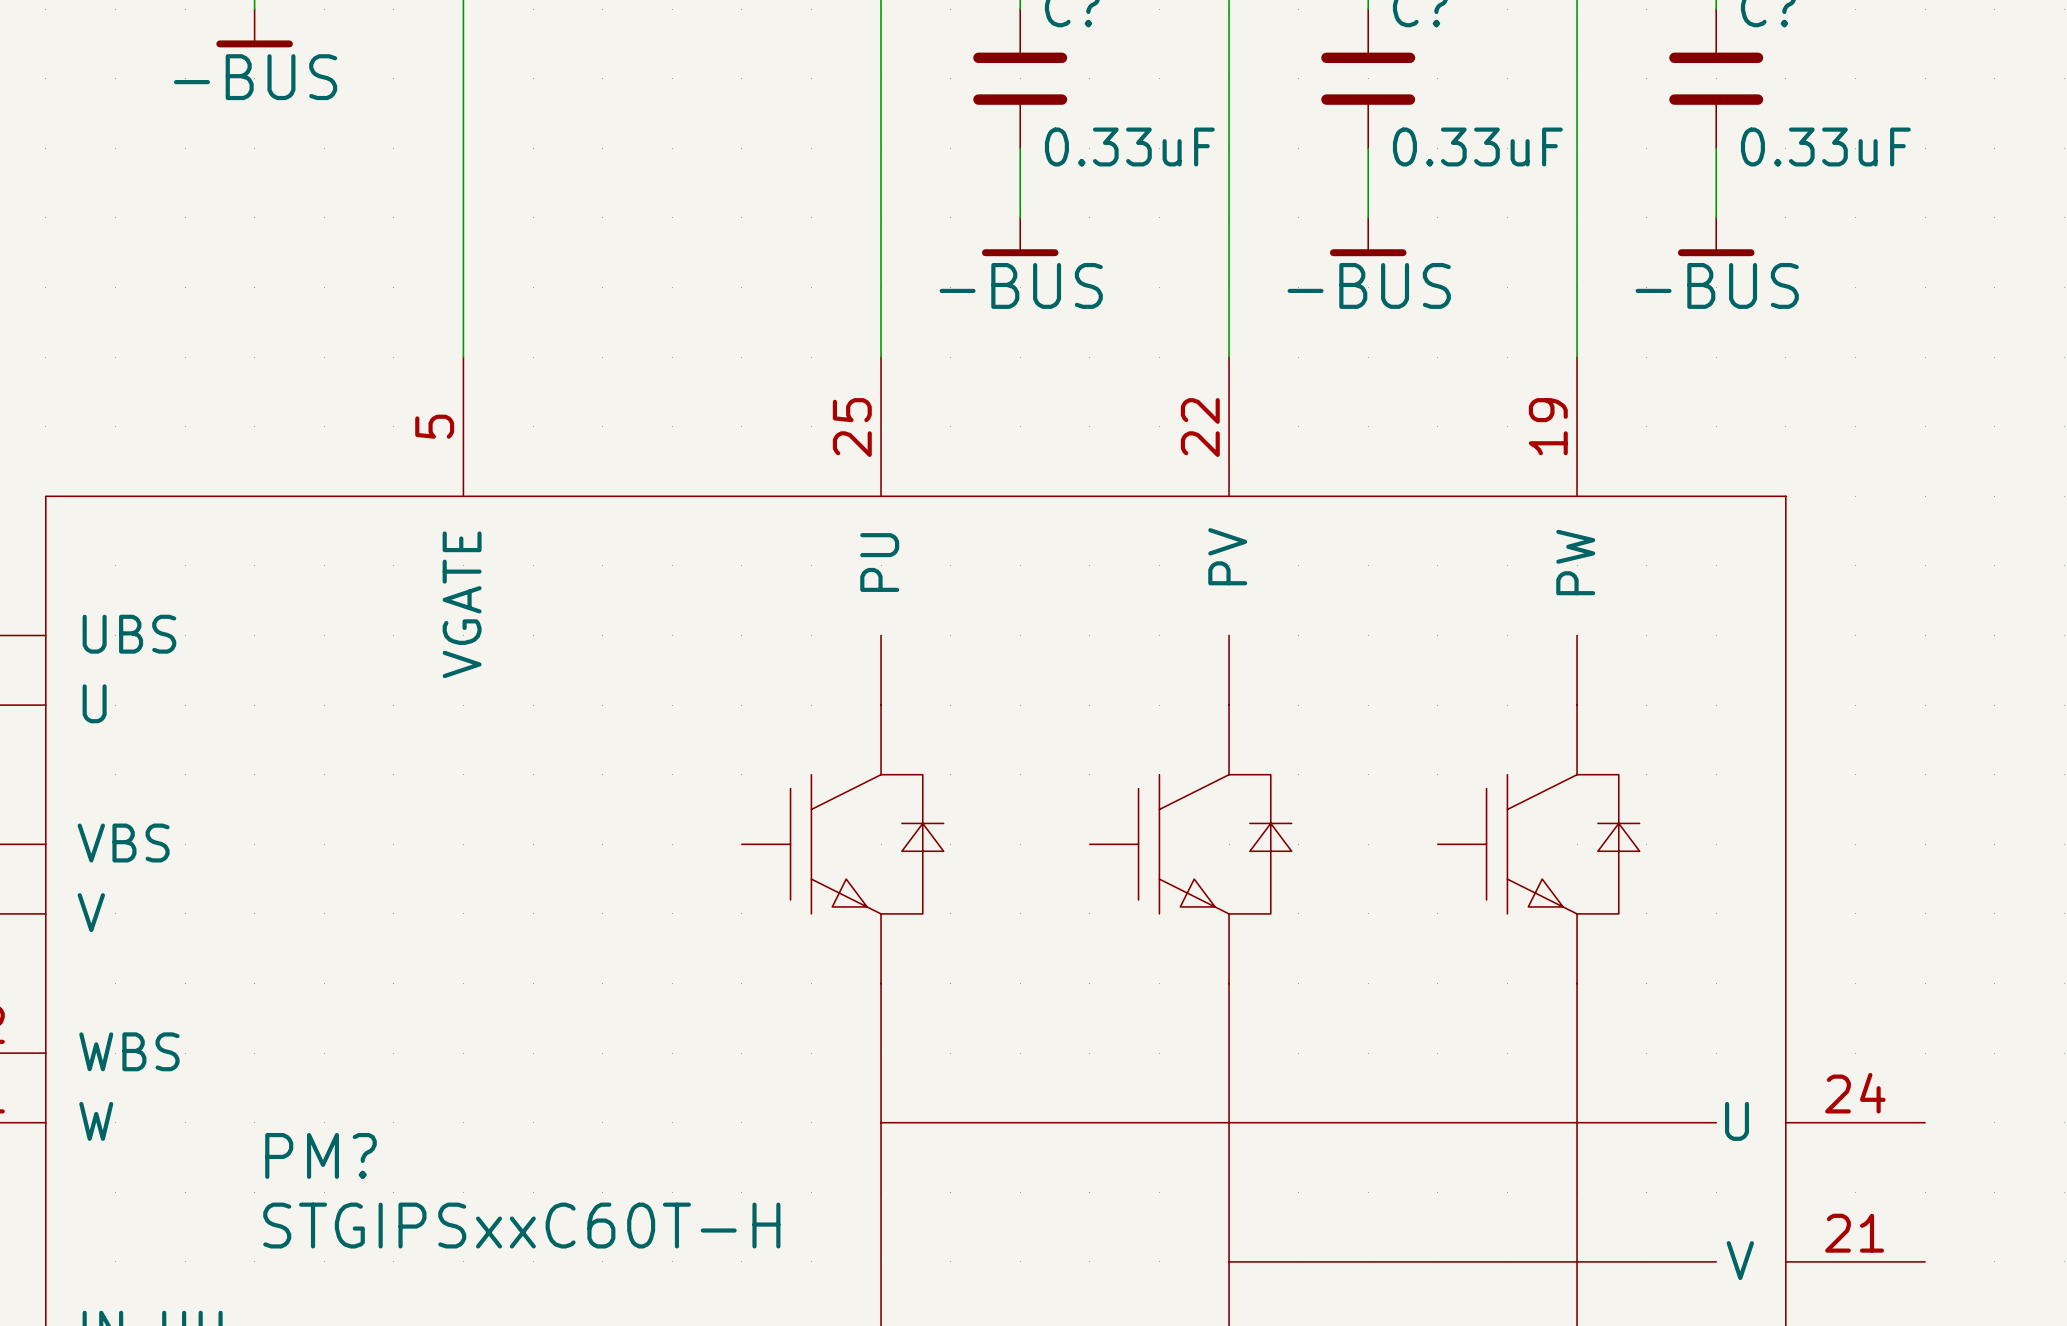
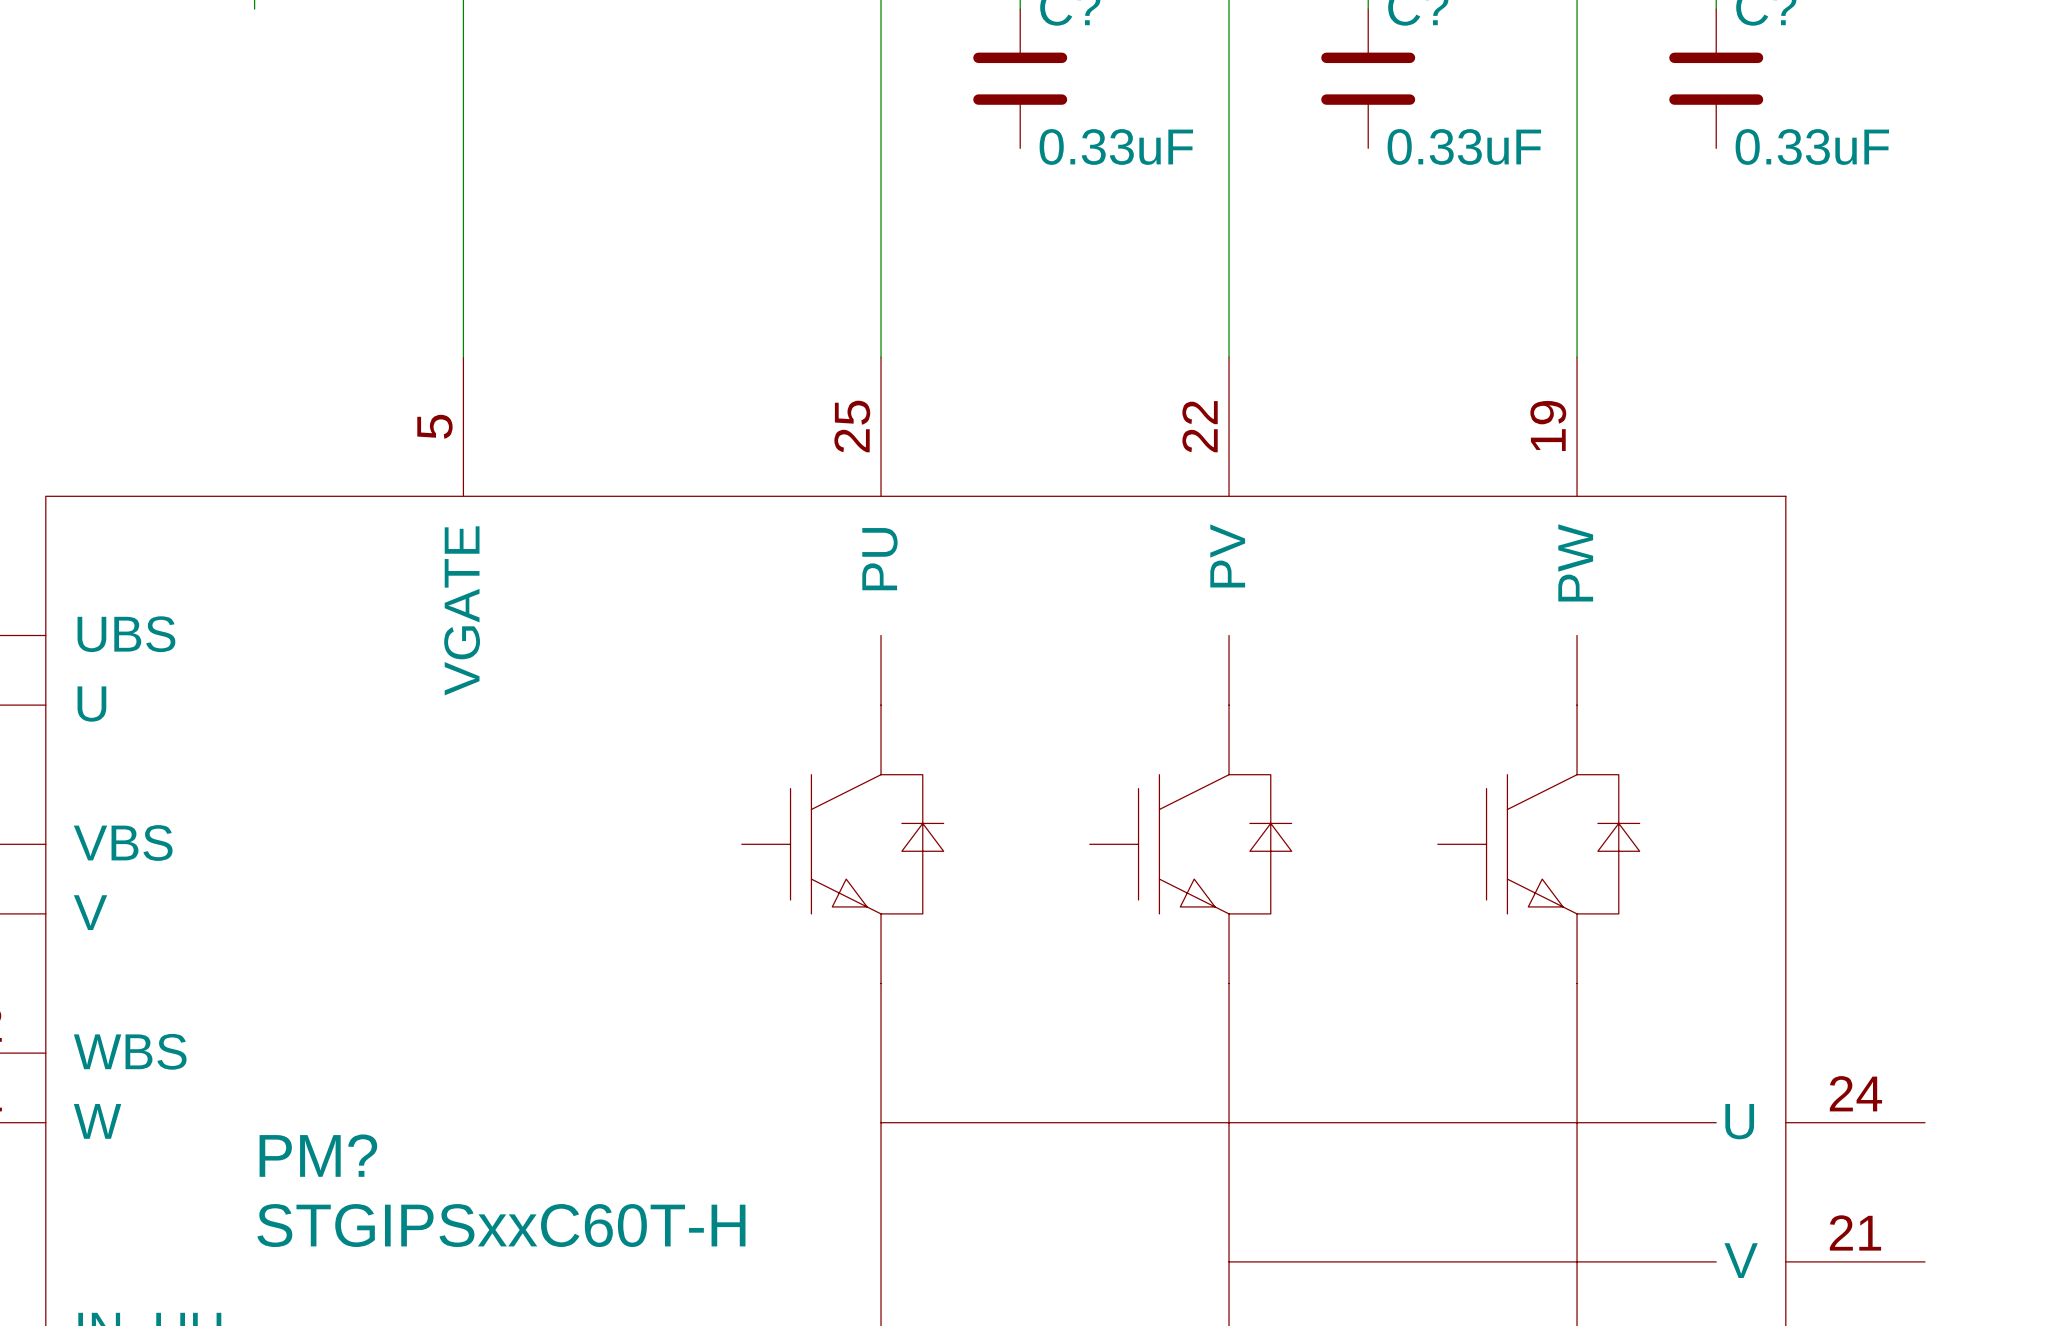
power symbol: -BUS (254, 28) -> none
wire: (1020, 148) (1020, 217) -> none
wire: (1368, 148) (1368, 217) -> none
wire: (1716, 148) (1716, 217) -> none
power symbol: -BUS (1020, 237) -> none
power symbol: -BUS (1368, 237) -> none
power symbol: -BUS (1716, 237) -> none

